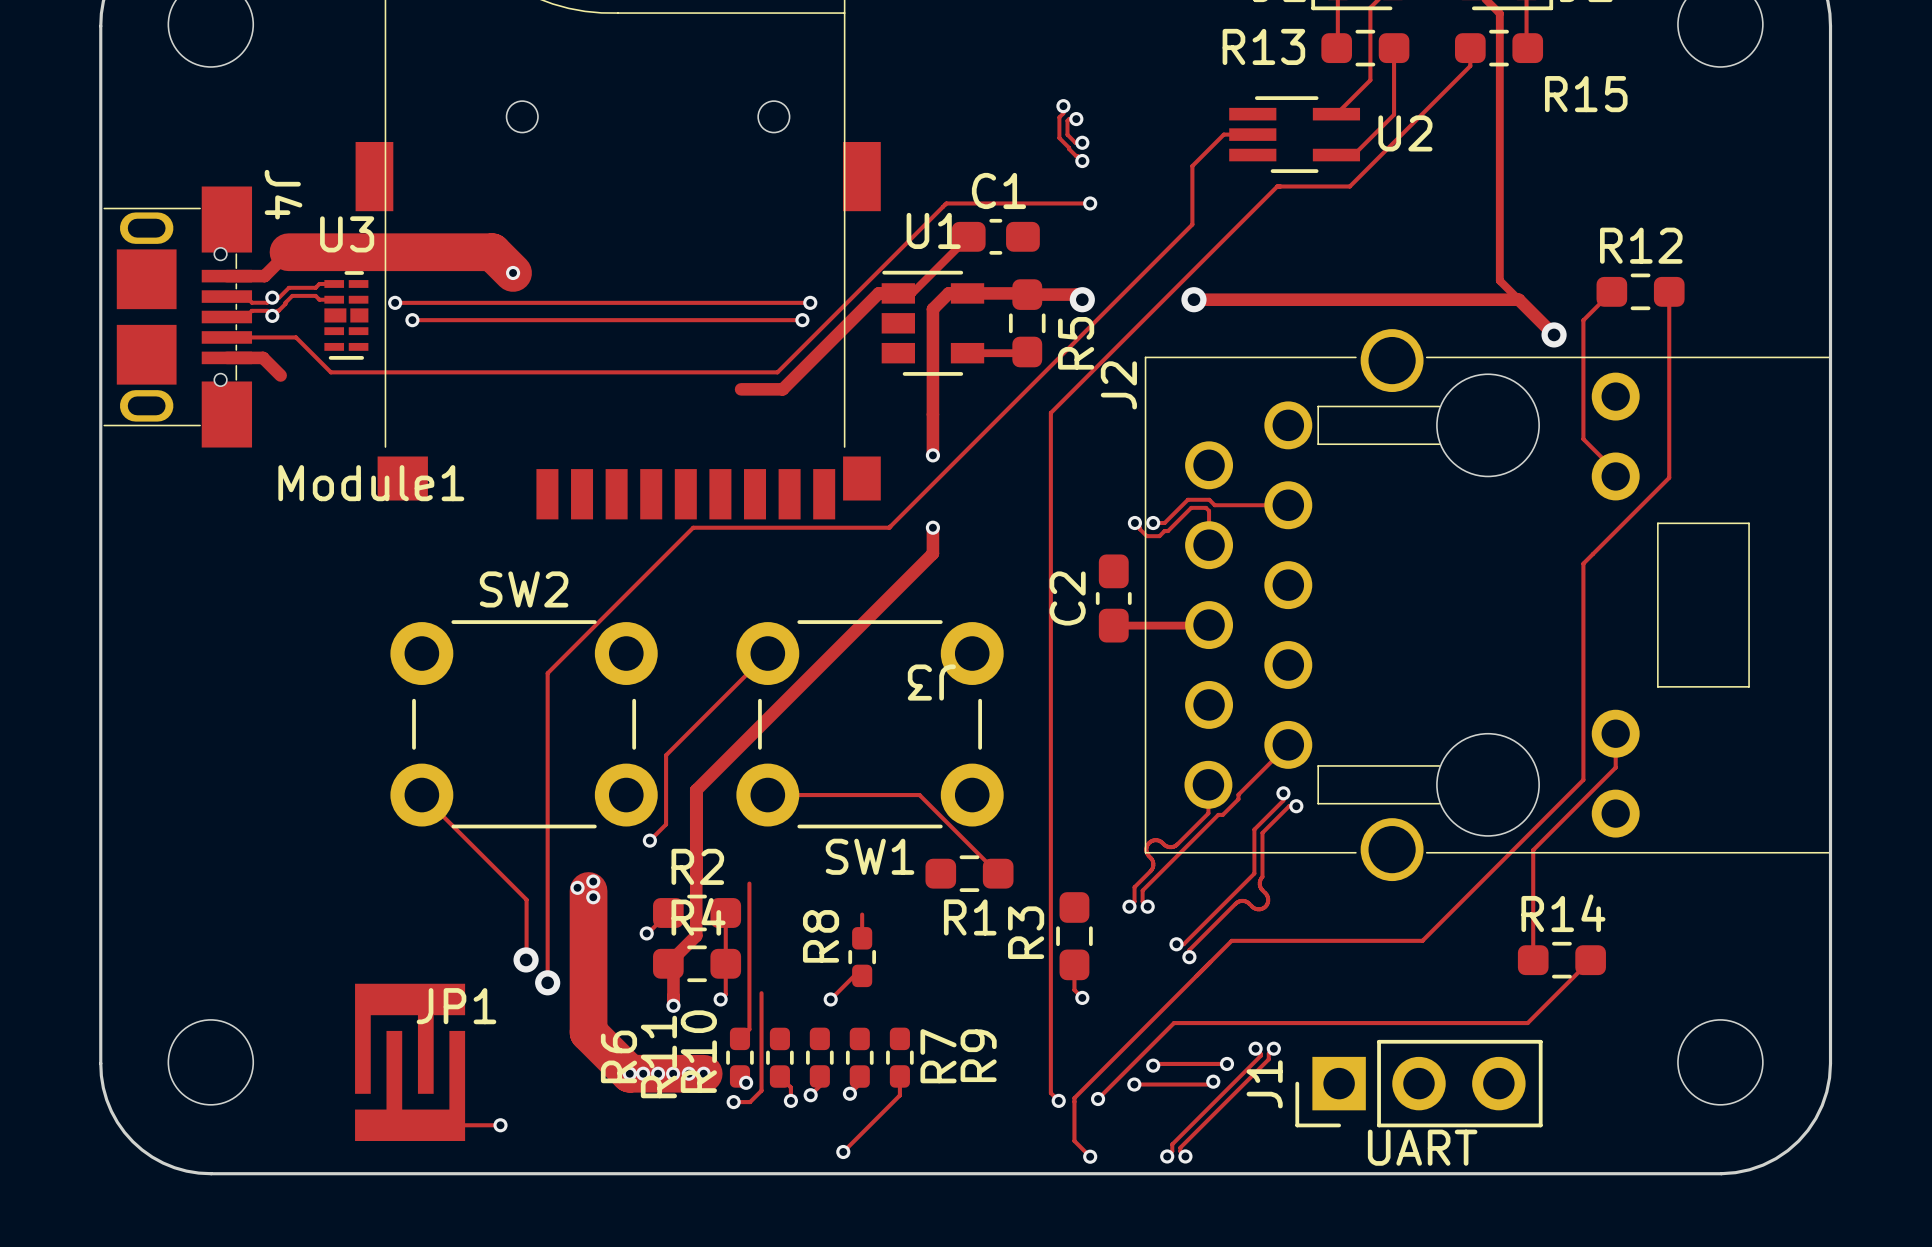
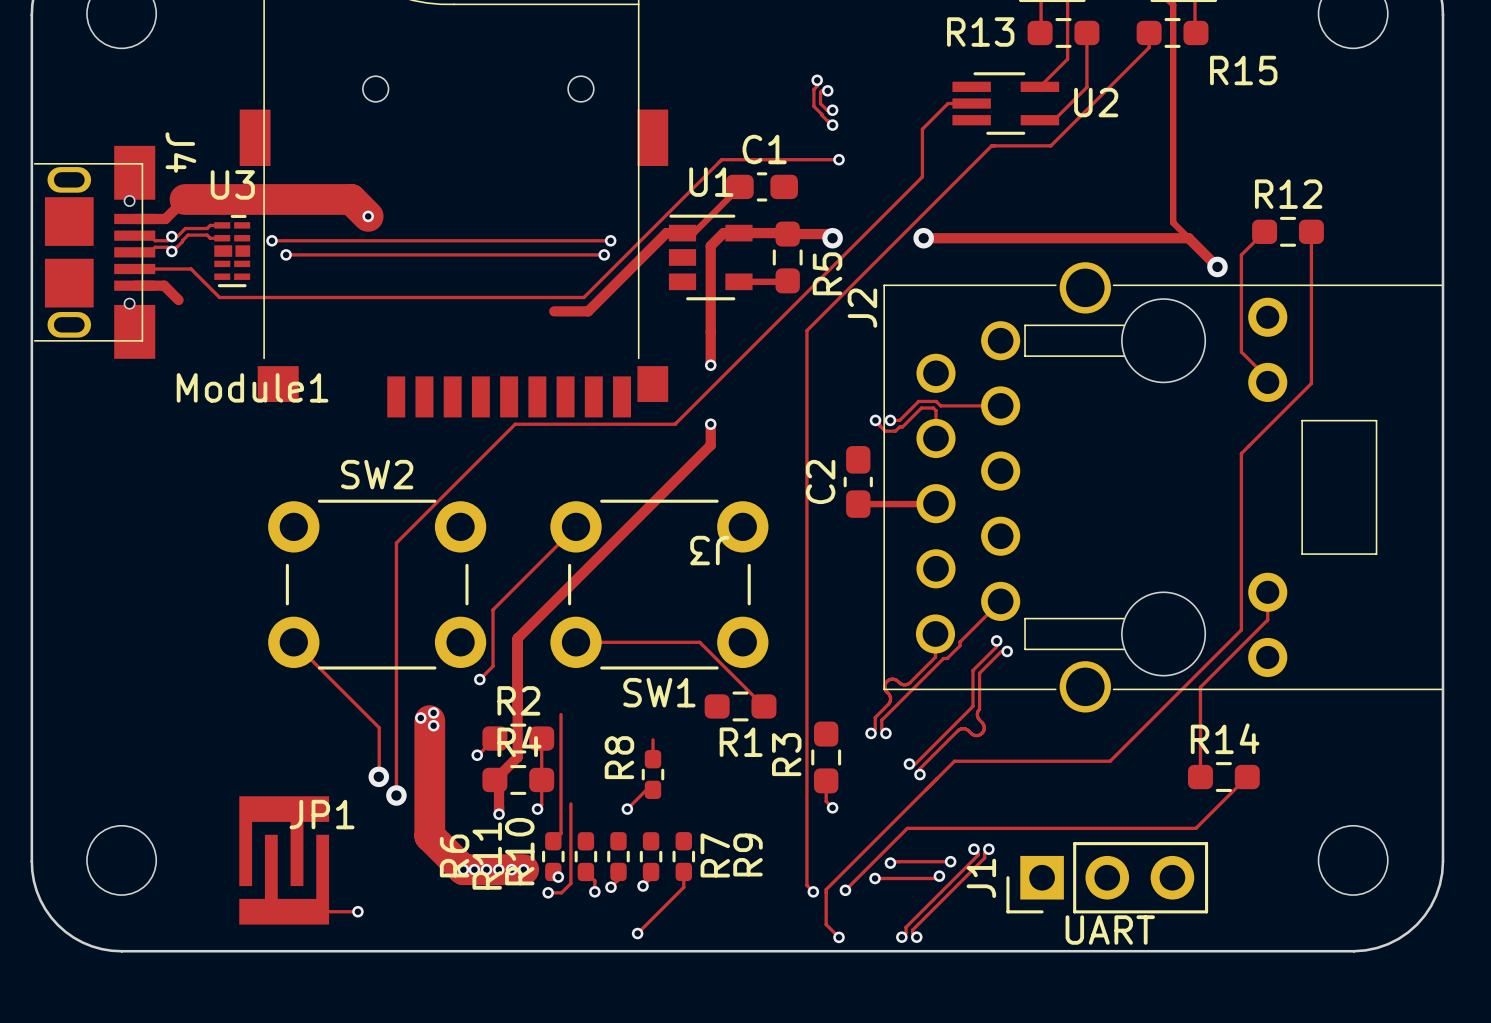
J4 footprint: [103, 186, 253, 448] -> [34, 145, 156, 359]

